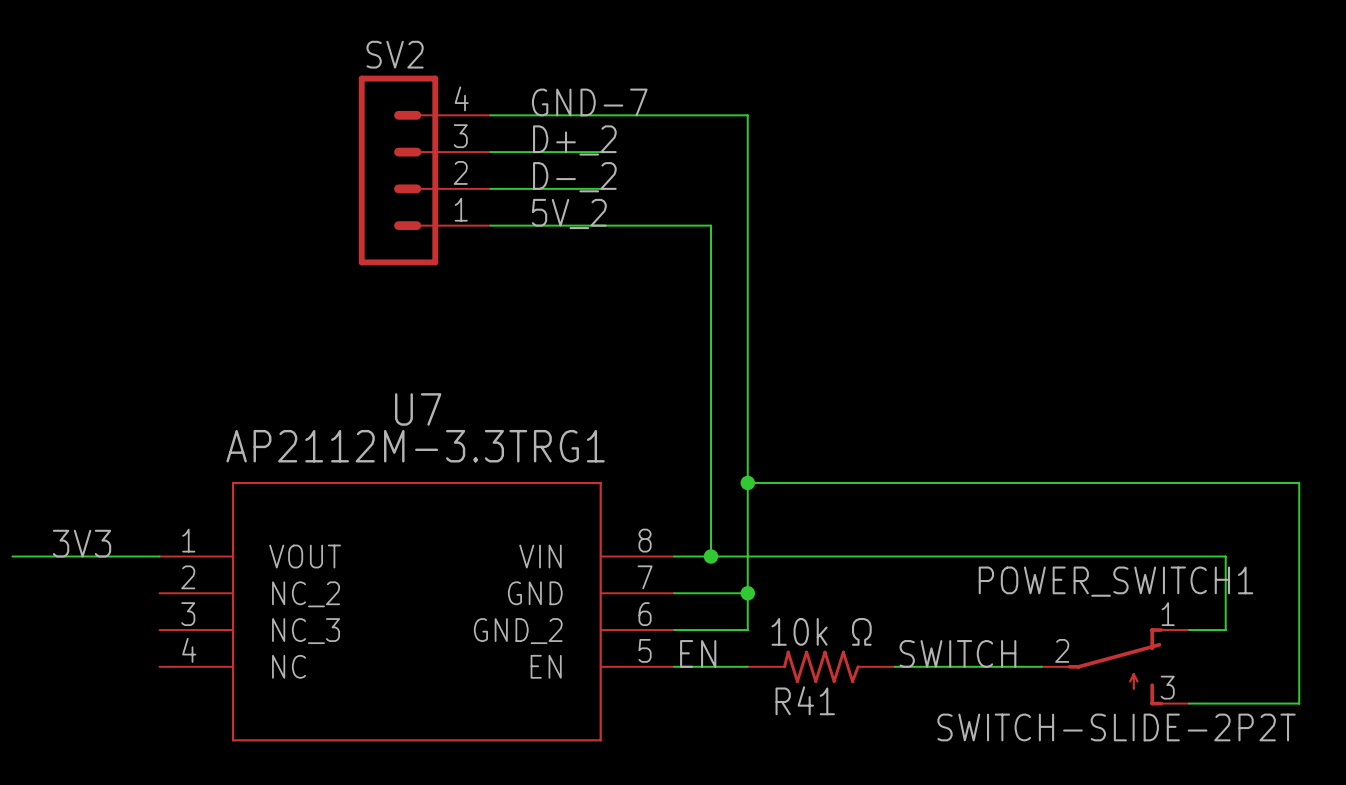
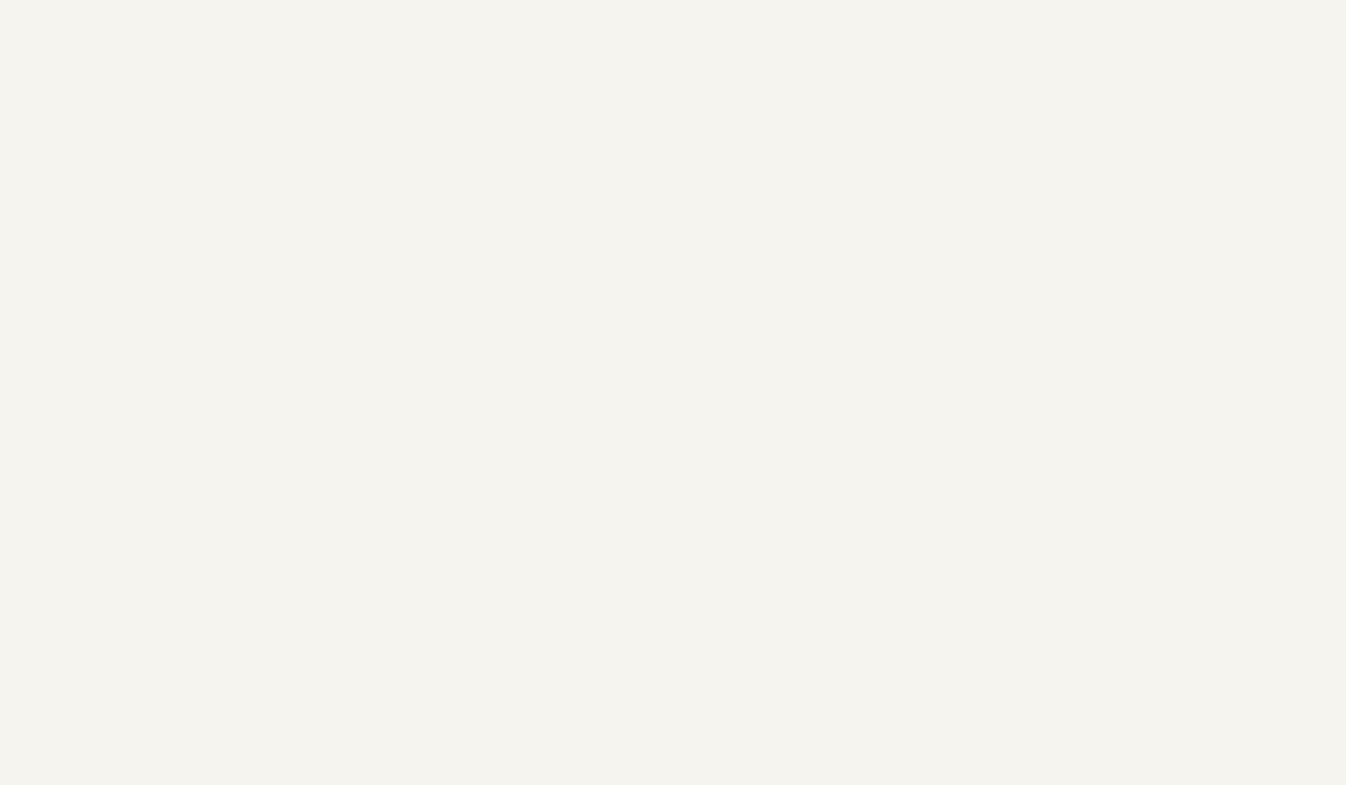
label: GND-7 (589, 102) -> none
wire: (490, 115) (747, 115) (747, 630) (674, 630) -> none
label: D+_2 (574, 140) -> none
wire: (490, 152) (600, 152) -> none
SV2: (424, 170) -> none
label: D-_2 (574, 177) -> none
wire: (490, 188) (600, 188) -> none
label: 5V_2 (569, 213) -> none
wire: (490, 225) (711, 225) (711, 556) -> none
wire: (747, 482) (1299, 482) (1299, 703) (1188, 703) -> none
junction: (747, 482) -> none
label: 3V3 (82, 543) -> none
wire: (12, 556) (159, 556) -> none
wire: (674, 556) (1225, 556) (1225, 630) (1188, 630) -> none
junction: (711, 556) -> none
wire: (674, 593) (747, 593) -> none
junction: (747, 593) -> none
U7: AP2112M-3.3TRG1 (416, 611) -> none
label: EN (698, 653) -> none
label: SWITCH (957, 653) -> none
wire: (674, 666) (747, 666) -> none
R41: 10k Ω (821, 666) -> none
wire: (894, 666) (1041, 666) -> none
POWER_SWITCH1: SWITCH-SLIDE-2P2T (1115, 666) -> none

